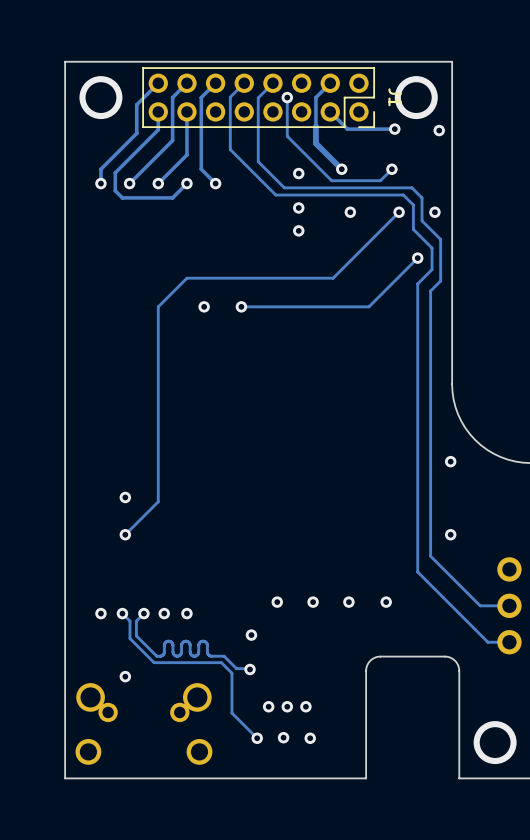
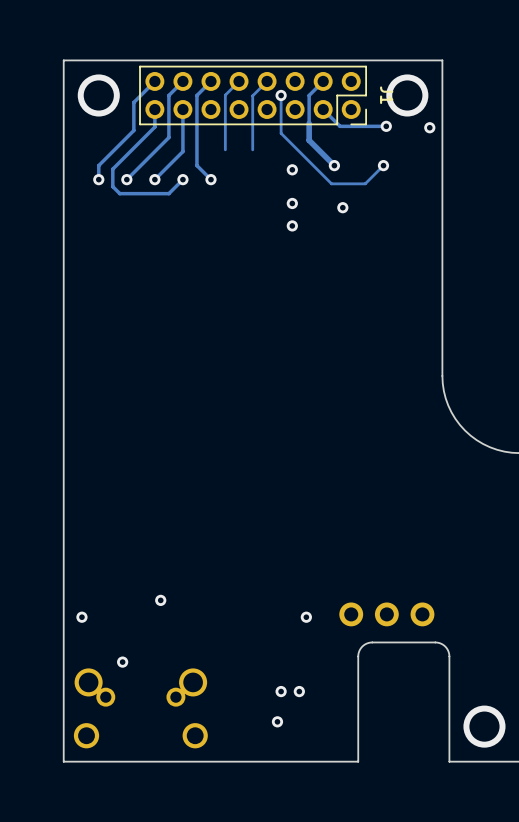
track: (230, 149) (275, 195) (403, 195) (413, 205) (413, 229) (432, 248) (432, 269) (417, 283) (417, 572) (487, 642) (509, 642) -> (225, 146) (225, 149)
track: (258, 153) (258, 161) (284, 187) (338, 187) -> (324, 176) (331, 183)
track: (380, 180) (331, 180) -> (372, 176) (365, 183)
track: (373, 187) (411, 187) (422, 197) (422, 220) (440, 239) (440, 281) (430, 291) (430, 556) (480, 605) (509, 605) -> none
track: (399, 212) (333, 278) (186, 278) (158, 306) (158, 501) (125, 534) -> none
via: (399, 212) -> none
via: (434, 212) -> none
track: (417, 258) (368, 306) (241, 306) -> none
via: (417, 258) -> none
via: (204, 306) -> none
via: (241, 306) -> none
via: (450, 461) -> none
via: (125, 497) -> none
via: (125, 534) -> none
via: (450, 534) -> none
via: (277, 602) -> none
via: (313, 602) -> none
via: (348, 602) -> none
via: (386, 602) -> none
part rotation: 0° (509, 605) -> 90° clockwise (386, 614)
part position: (509, 605) -> (386, 614)
via: (100, 613) -> none
track: (122, 613) (129, 621) (129, 638) (154, 662) (221, 662) (231, 673) (231, 713) (257, 738) -> none
via: (122, 613) -> none
track: (143, 613) (136, 621) (136, 635) (156, 656) (163, 654) (164, 643) (168, 641) (172, 643) (173, 652) (175, 655) (180, 654) (182, 643) (185, 641) (189, 643) (191, 654) (195, 656) (198, 652) (199, 643) (204, 641) (206, 643) (207, 652) (209, 655) (224, 656) (236, 668) (250, 669) -> none
via: (143, 613) -> none
via: (186, 613) -> none
via: none -> (81, 617)
via: none -> (306, 617)
via: (251, 635) -> none
via: (250, 669) -> none
via: (268, 706) -> none
via: (257, 738) -> none
via: (310, 738) -> none

